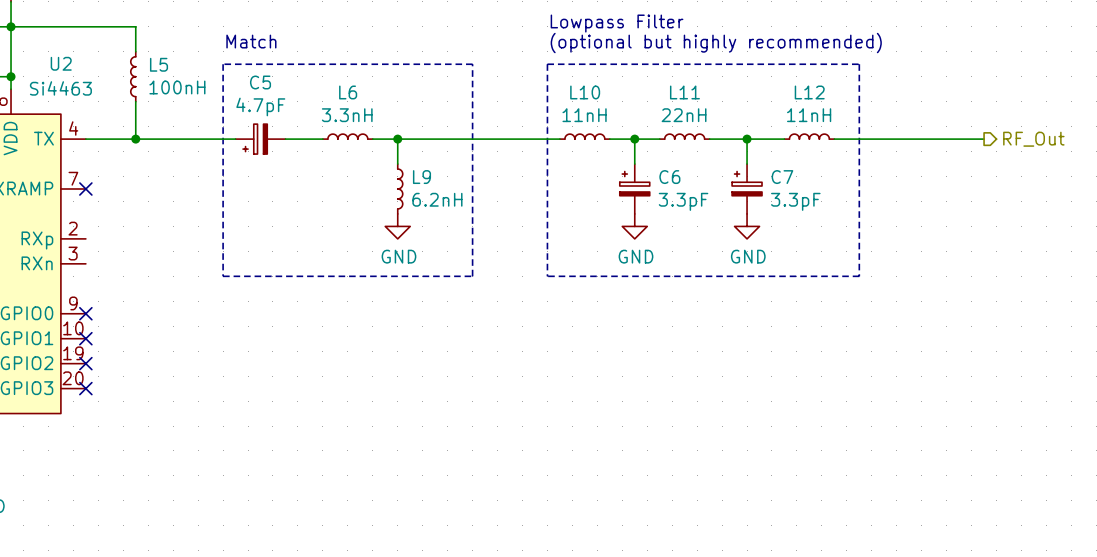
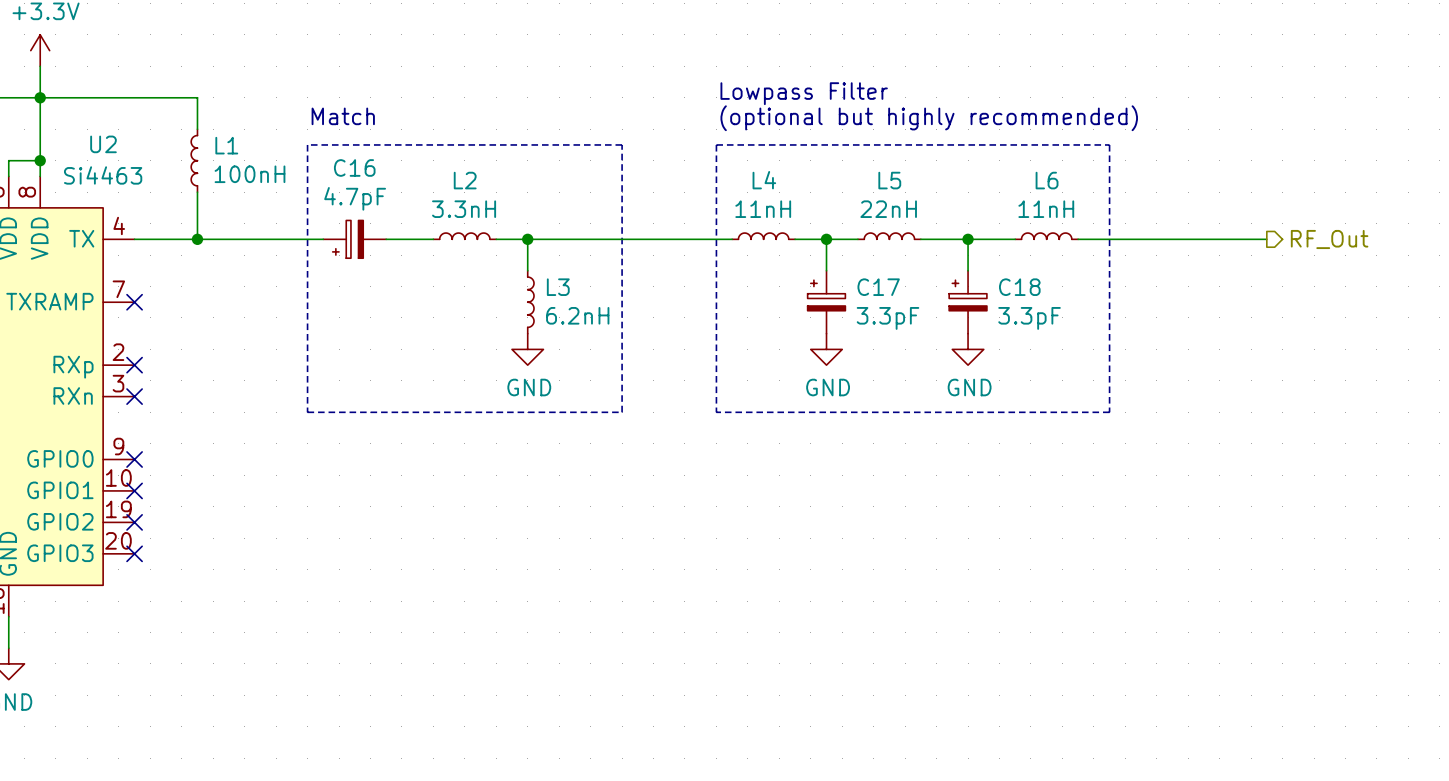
L5 name: L5 (159, 64) -> L1 (226, 145)
C5 name: C5 (260, 82) -> C16 (354, 167)
L6 name: L6 (348, 92) -> L2 (465, 180)
L10 name: L10 (585, 92) -> L4 (764, 180)
L11 name: L11 (684, 92) -> L5 (889, 180)
L12 name: L12 (809, 92) -> L6 (1047, 180)
L9 name: L9 (421, 177) -> L3 (558, 287)
C6 name: C6 (669, 177) -> C17 (878, 287)
C7 name: C7 (782, 177) -> C18 (1019, 287)
no-connect mark: none -> (134, 365)
no-connect mark: none -> (134, 396)

